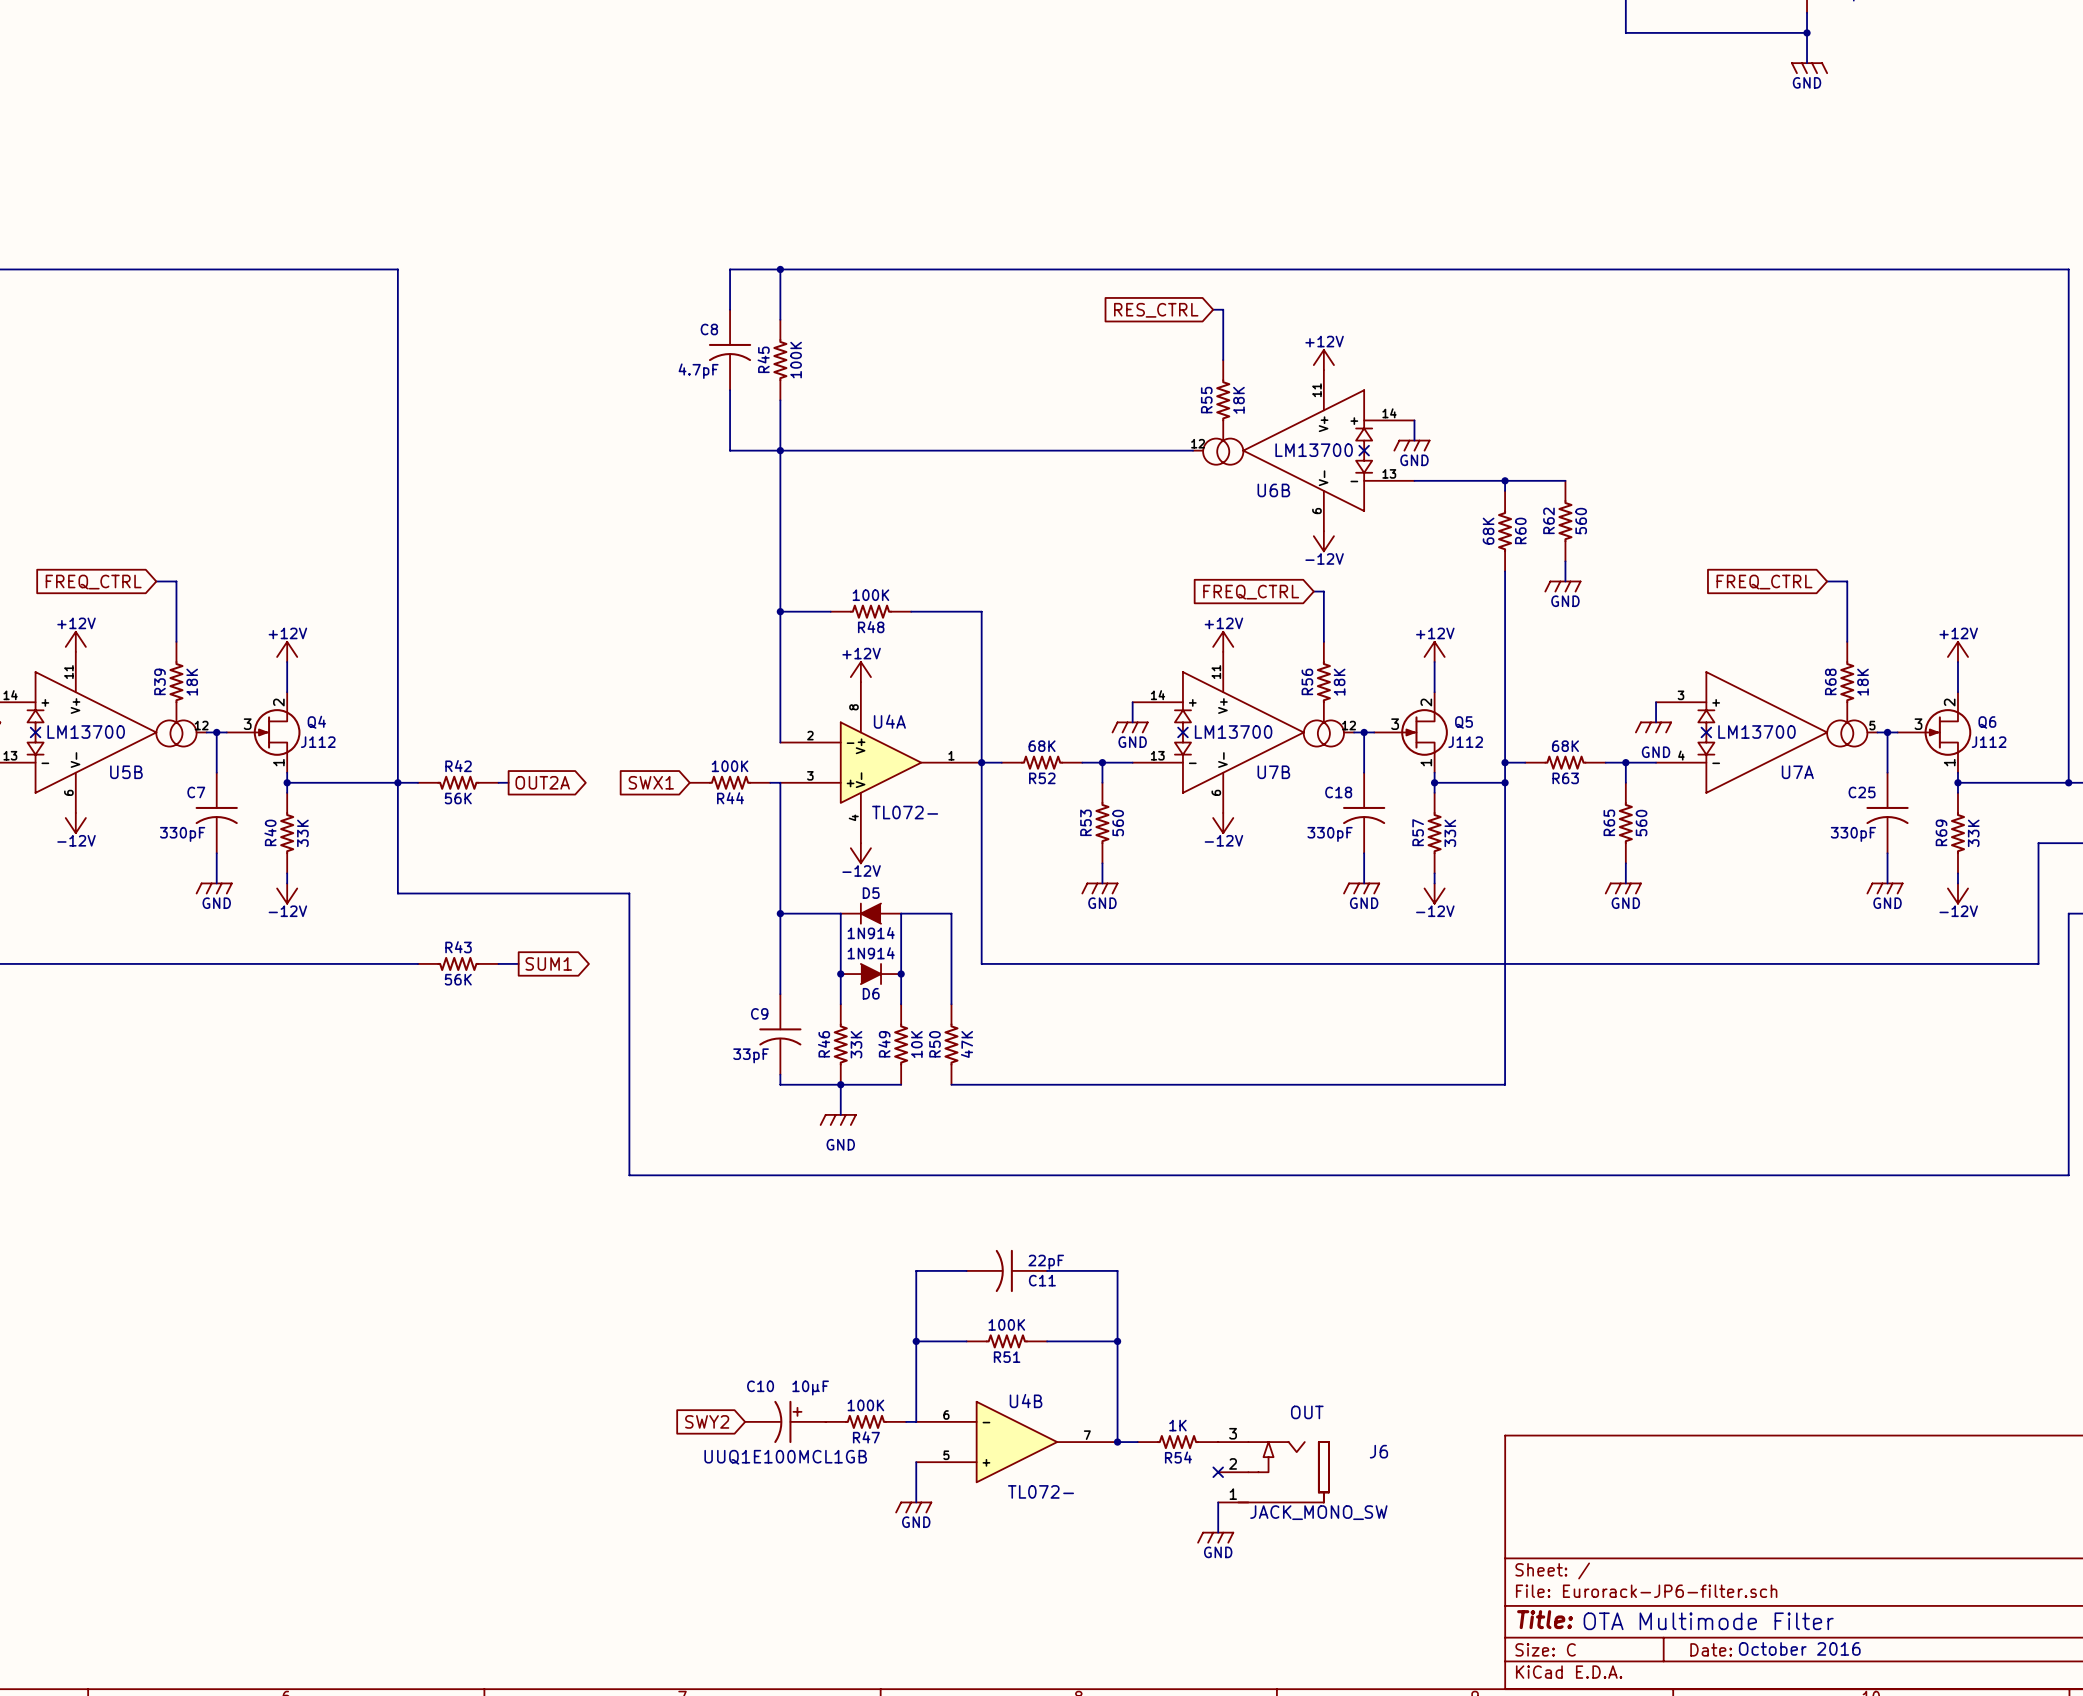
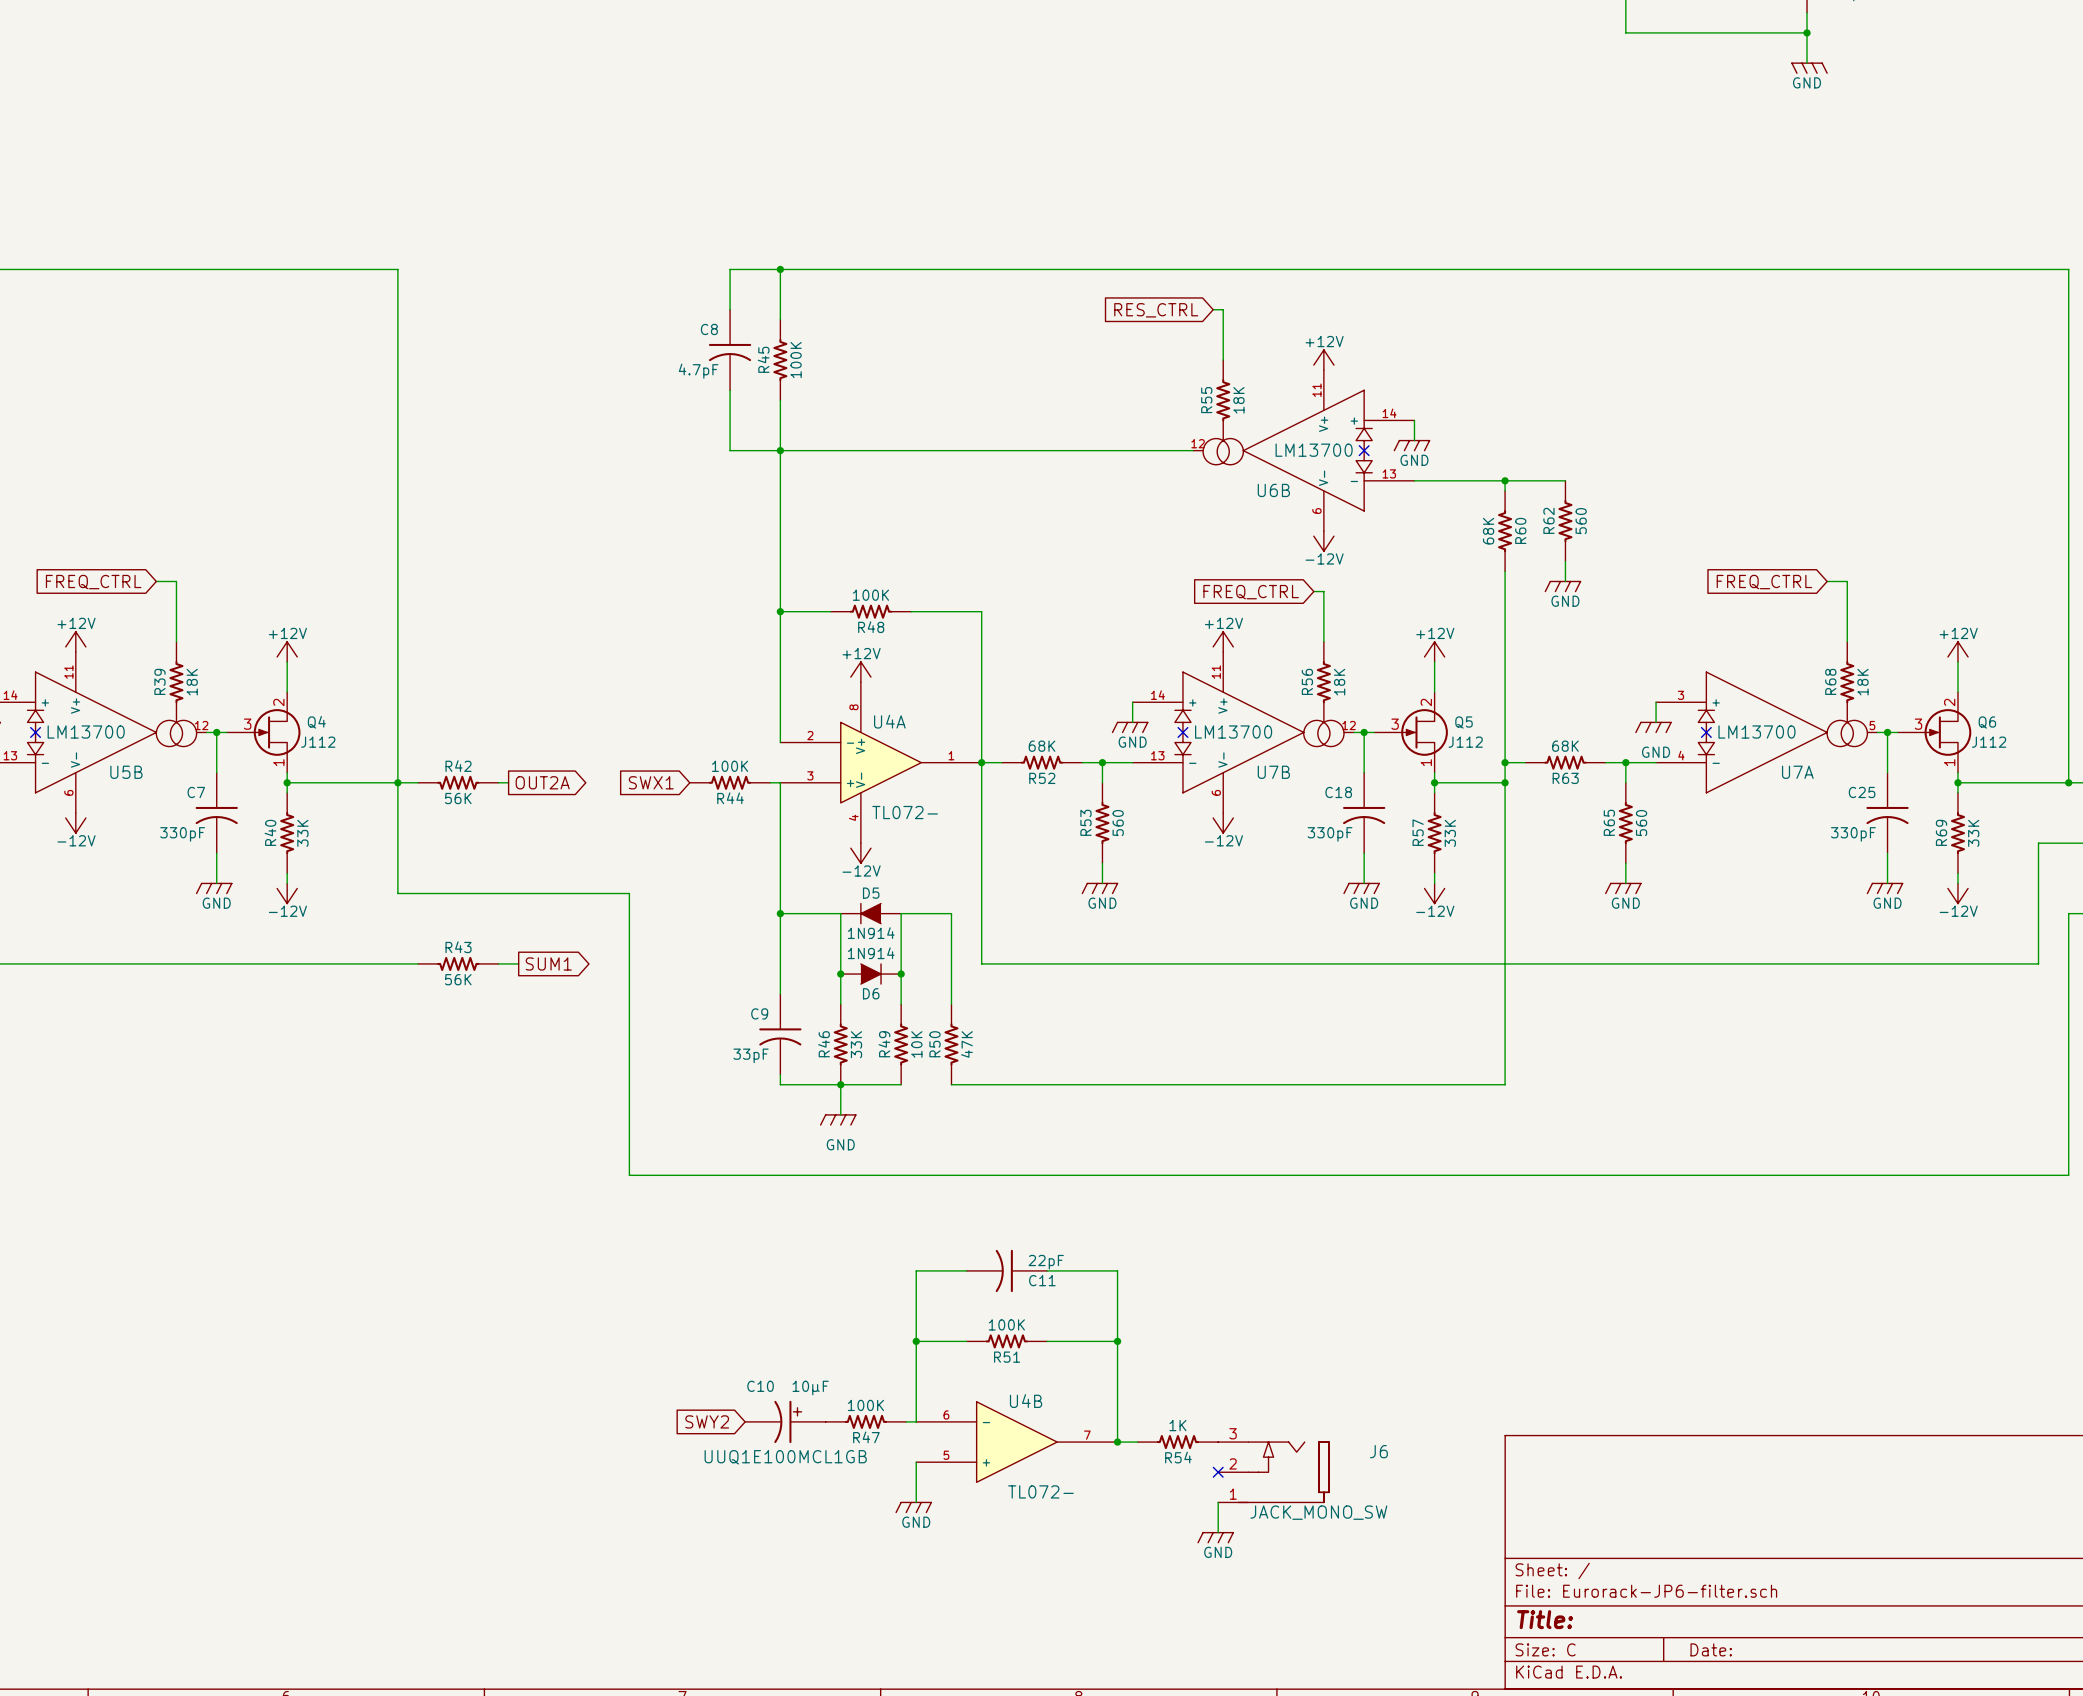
text: OUT (1307, 1412) -> none
text: OTA Multimode Filter (1708, 1621) -> none
text: October 2016 (1799, 1648) -> none

